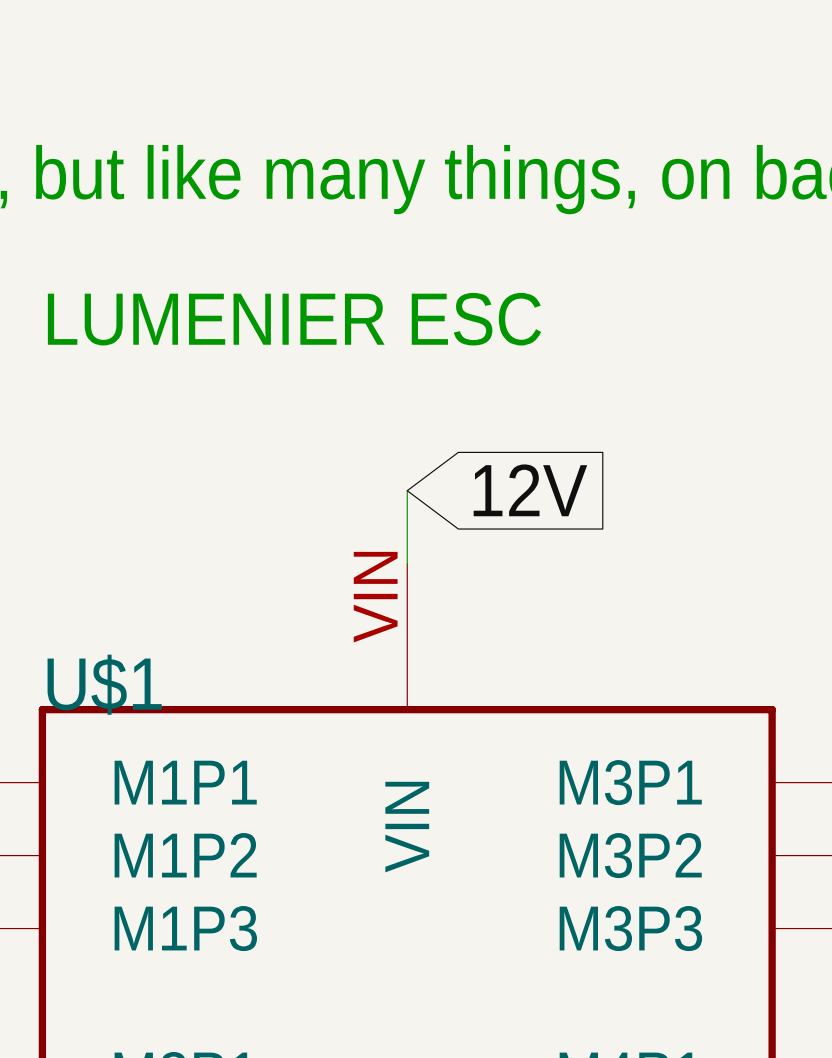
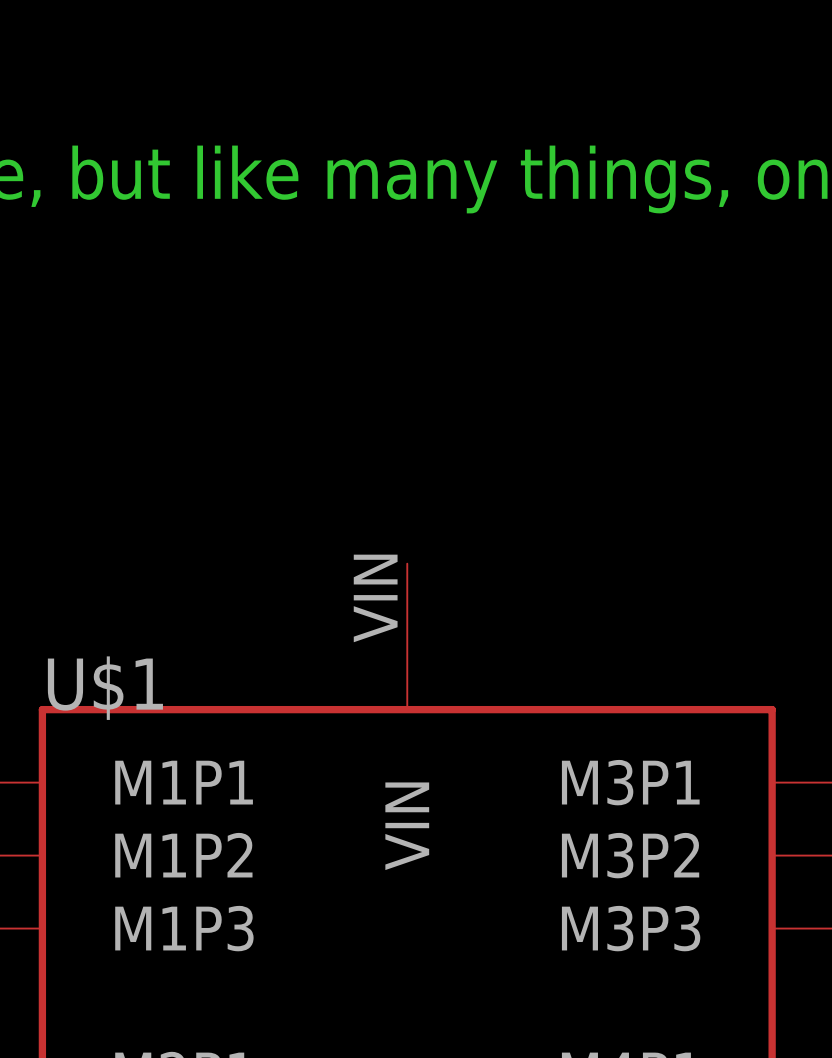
text: LUMENIER ESC (294, 319) -> none
wire: (407, 490) (407, 563) -> none
global label: 12V (530, 490) -> none

